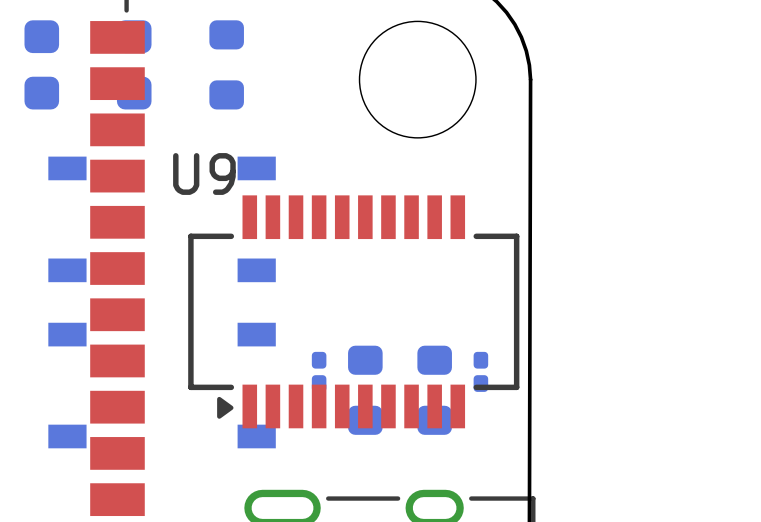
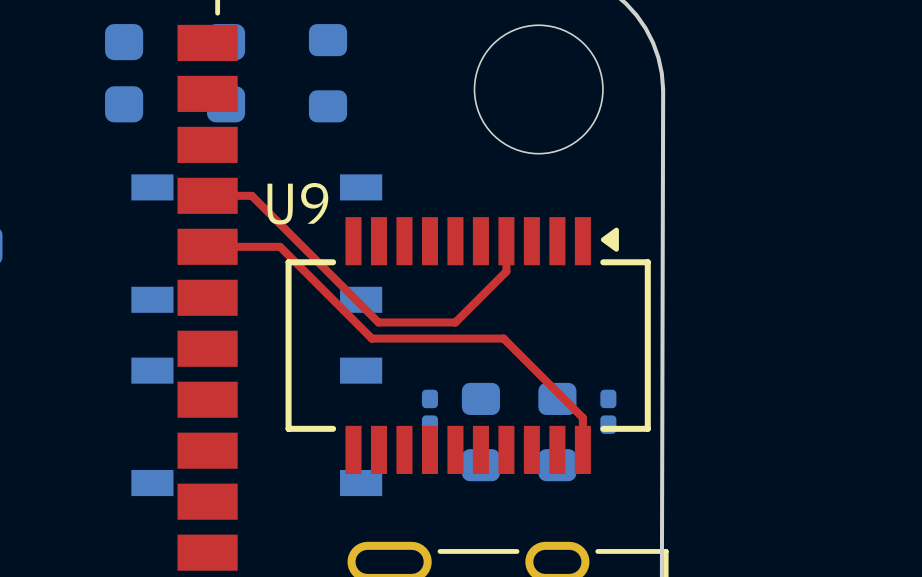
top track: none -> (207, 195) (251, 195) (378, 322) (455, 322) (506, 271) (506, 241)
top track: none -> (207, 246) (280, 246) (371, 338) (503, 338) (582, 417) (582, 449)
U9 rotation: 0° (353, 311) -> 180° (468, 345)

